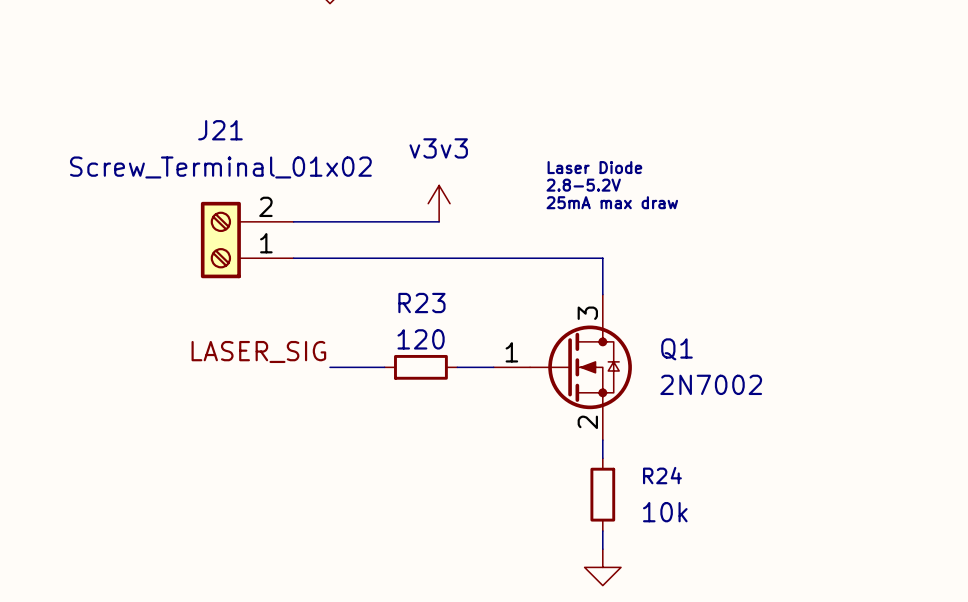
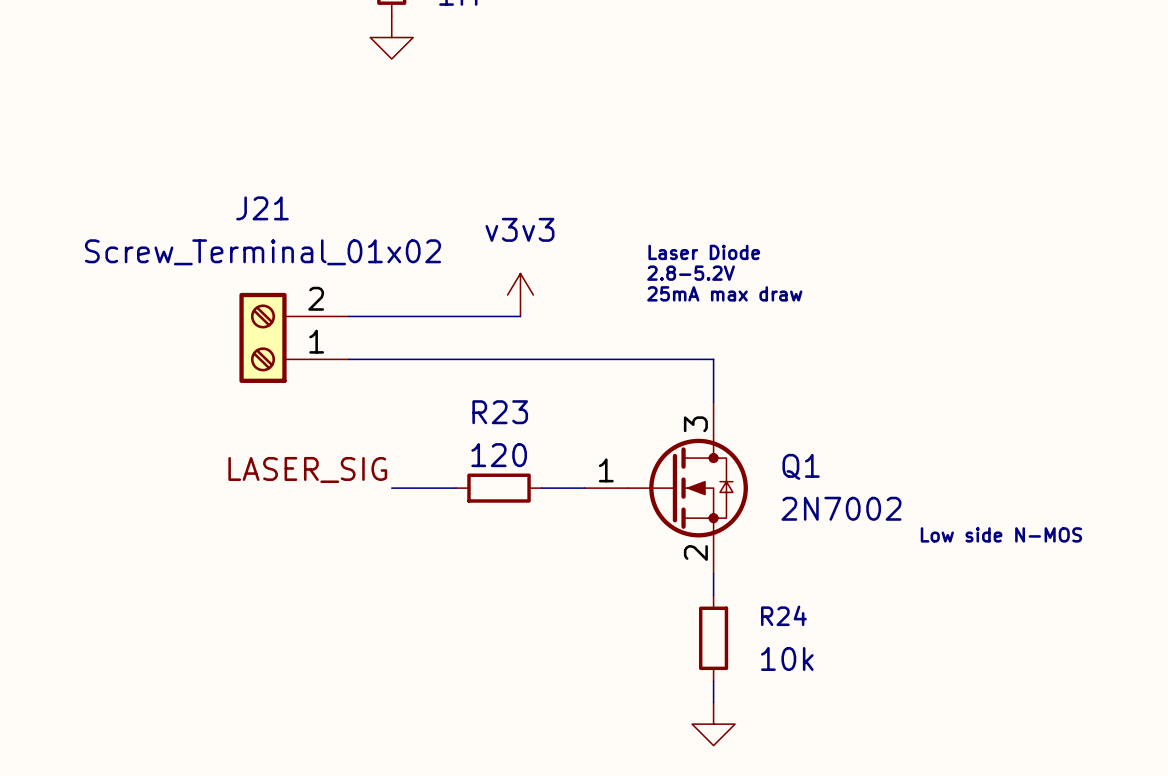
text: none -> Low side N-MOS (1001, 534)

